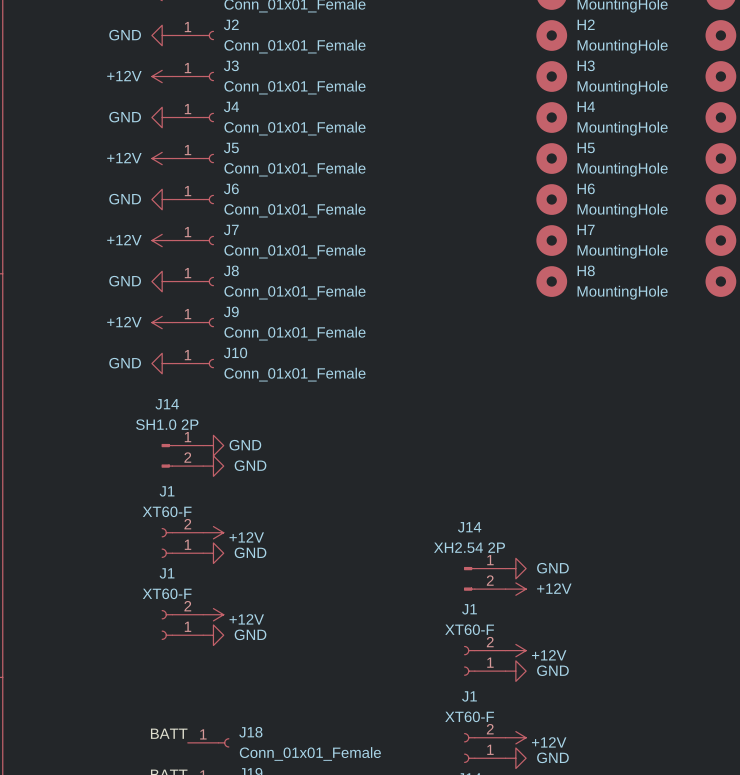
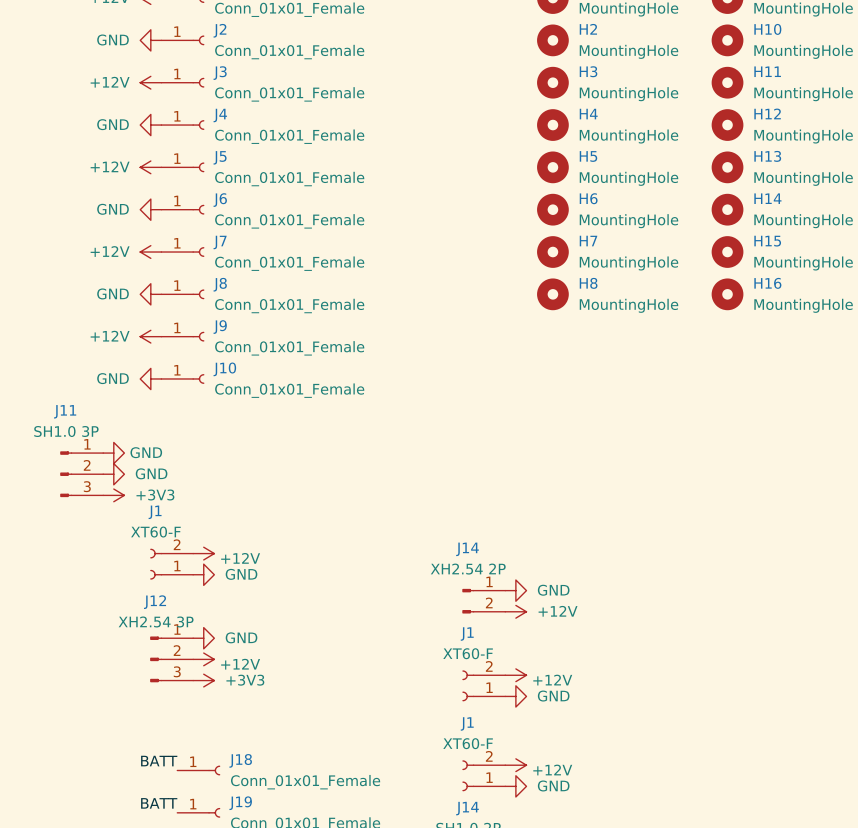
power symbol: none -> GND (113, 453)
power symbol: GND (213, 445) -> none
J11: none -> SH1.0 3P (81, 474)
power symbol: none -> GND (113, 474)
J14: SH1.0 2P (182, 455) -> none
power symbol: GND (213, 466) -> none
power symbol: none -> +3V3 (113, 495)
power symbol: +12V (213, 614) -> GND (203, 638)
J1: XT60-F (182, 624) -> none
J12: none -> XH2.54 3P (171, 659)
power symbol: GND (213, 635) -> +12V (203, 659)
power symbol: none -> +3V3 (203, 680)

